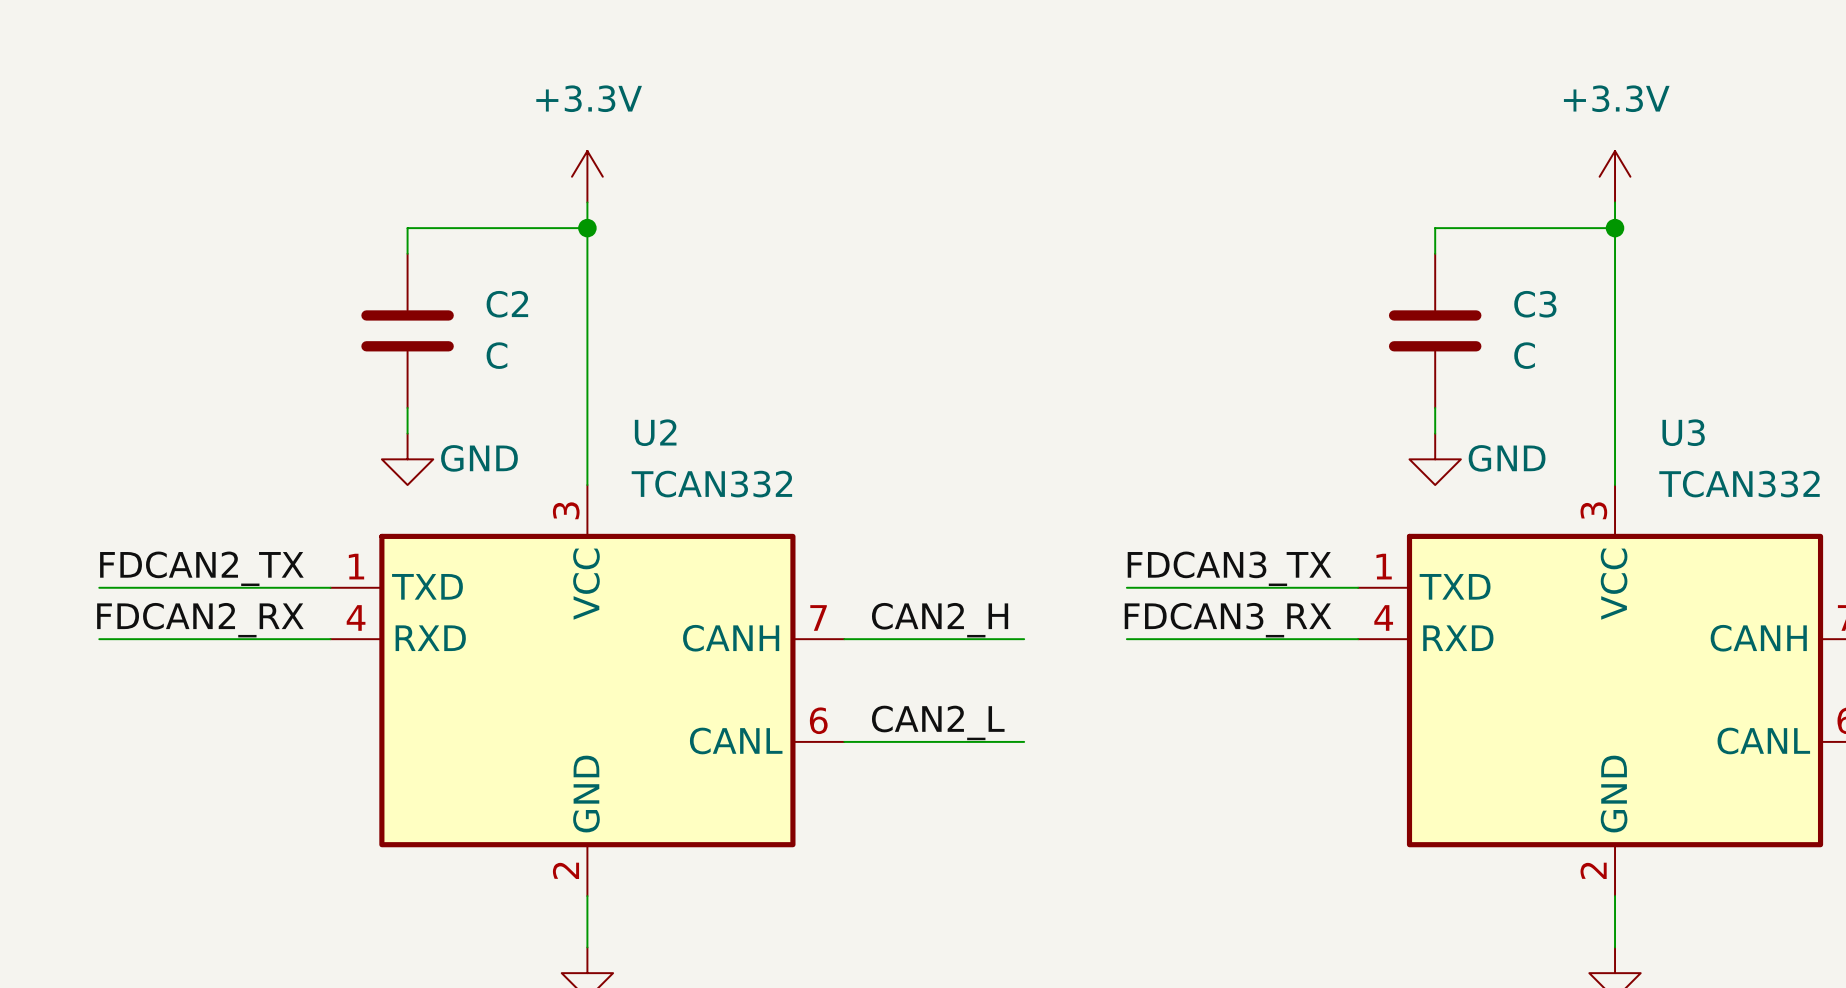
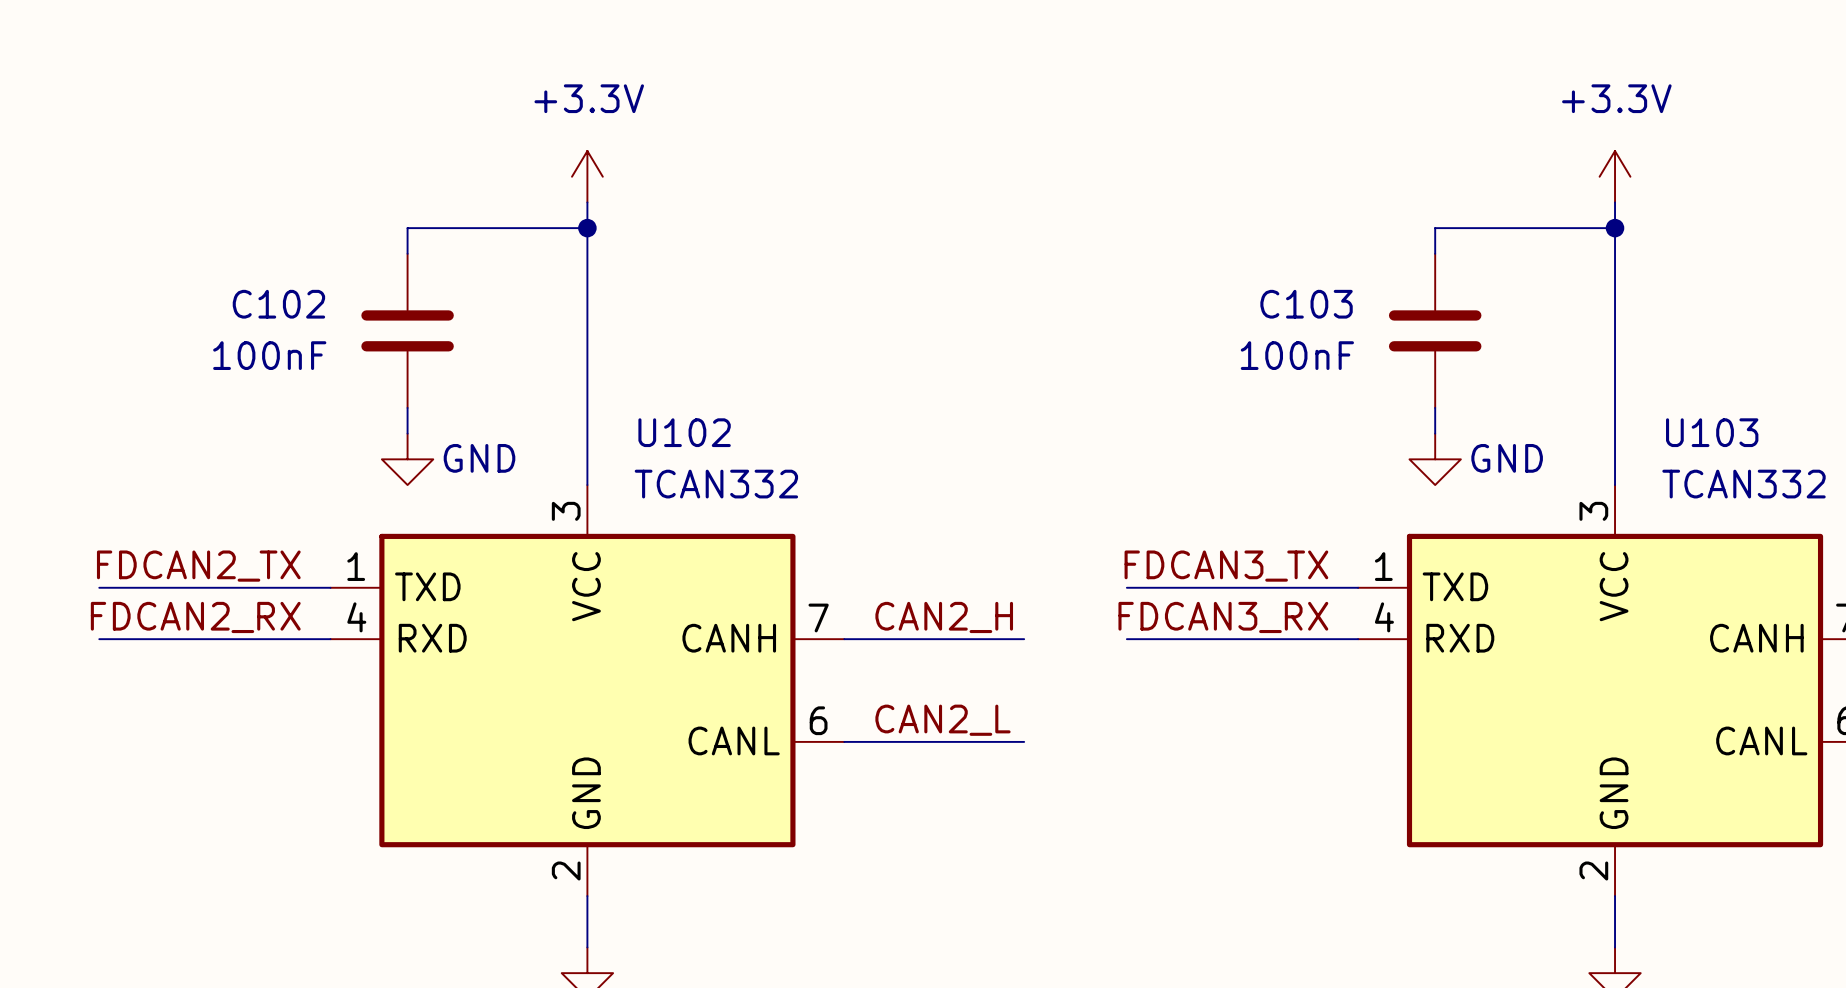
C2 name: C2 (507, 304) -> C102 (278, 304)
C3 name: C3 (1535, 304) -> C103 (1306, 304)
C2 value: C (496, 355) -> 100nF (269, 355)
C3 value: C (1524, 355) -> 100nF (1297, 355)
U2 name: U2 (655, 432) -> U102 (684, 432)
U3 name: U3 (1683, 432) -> U103 (1712, 432)

